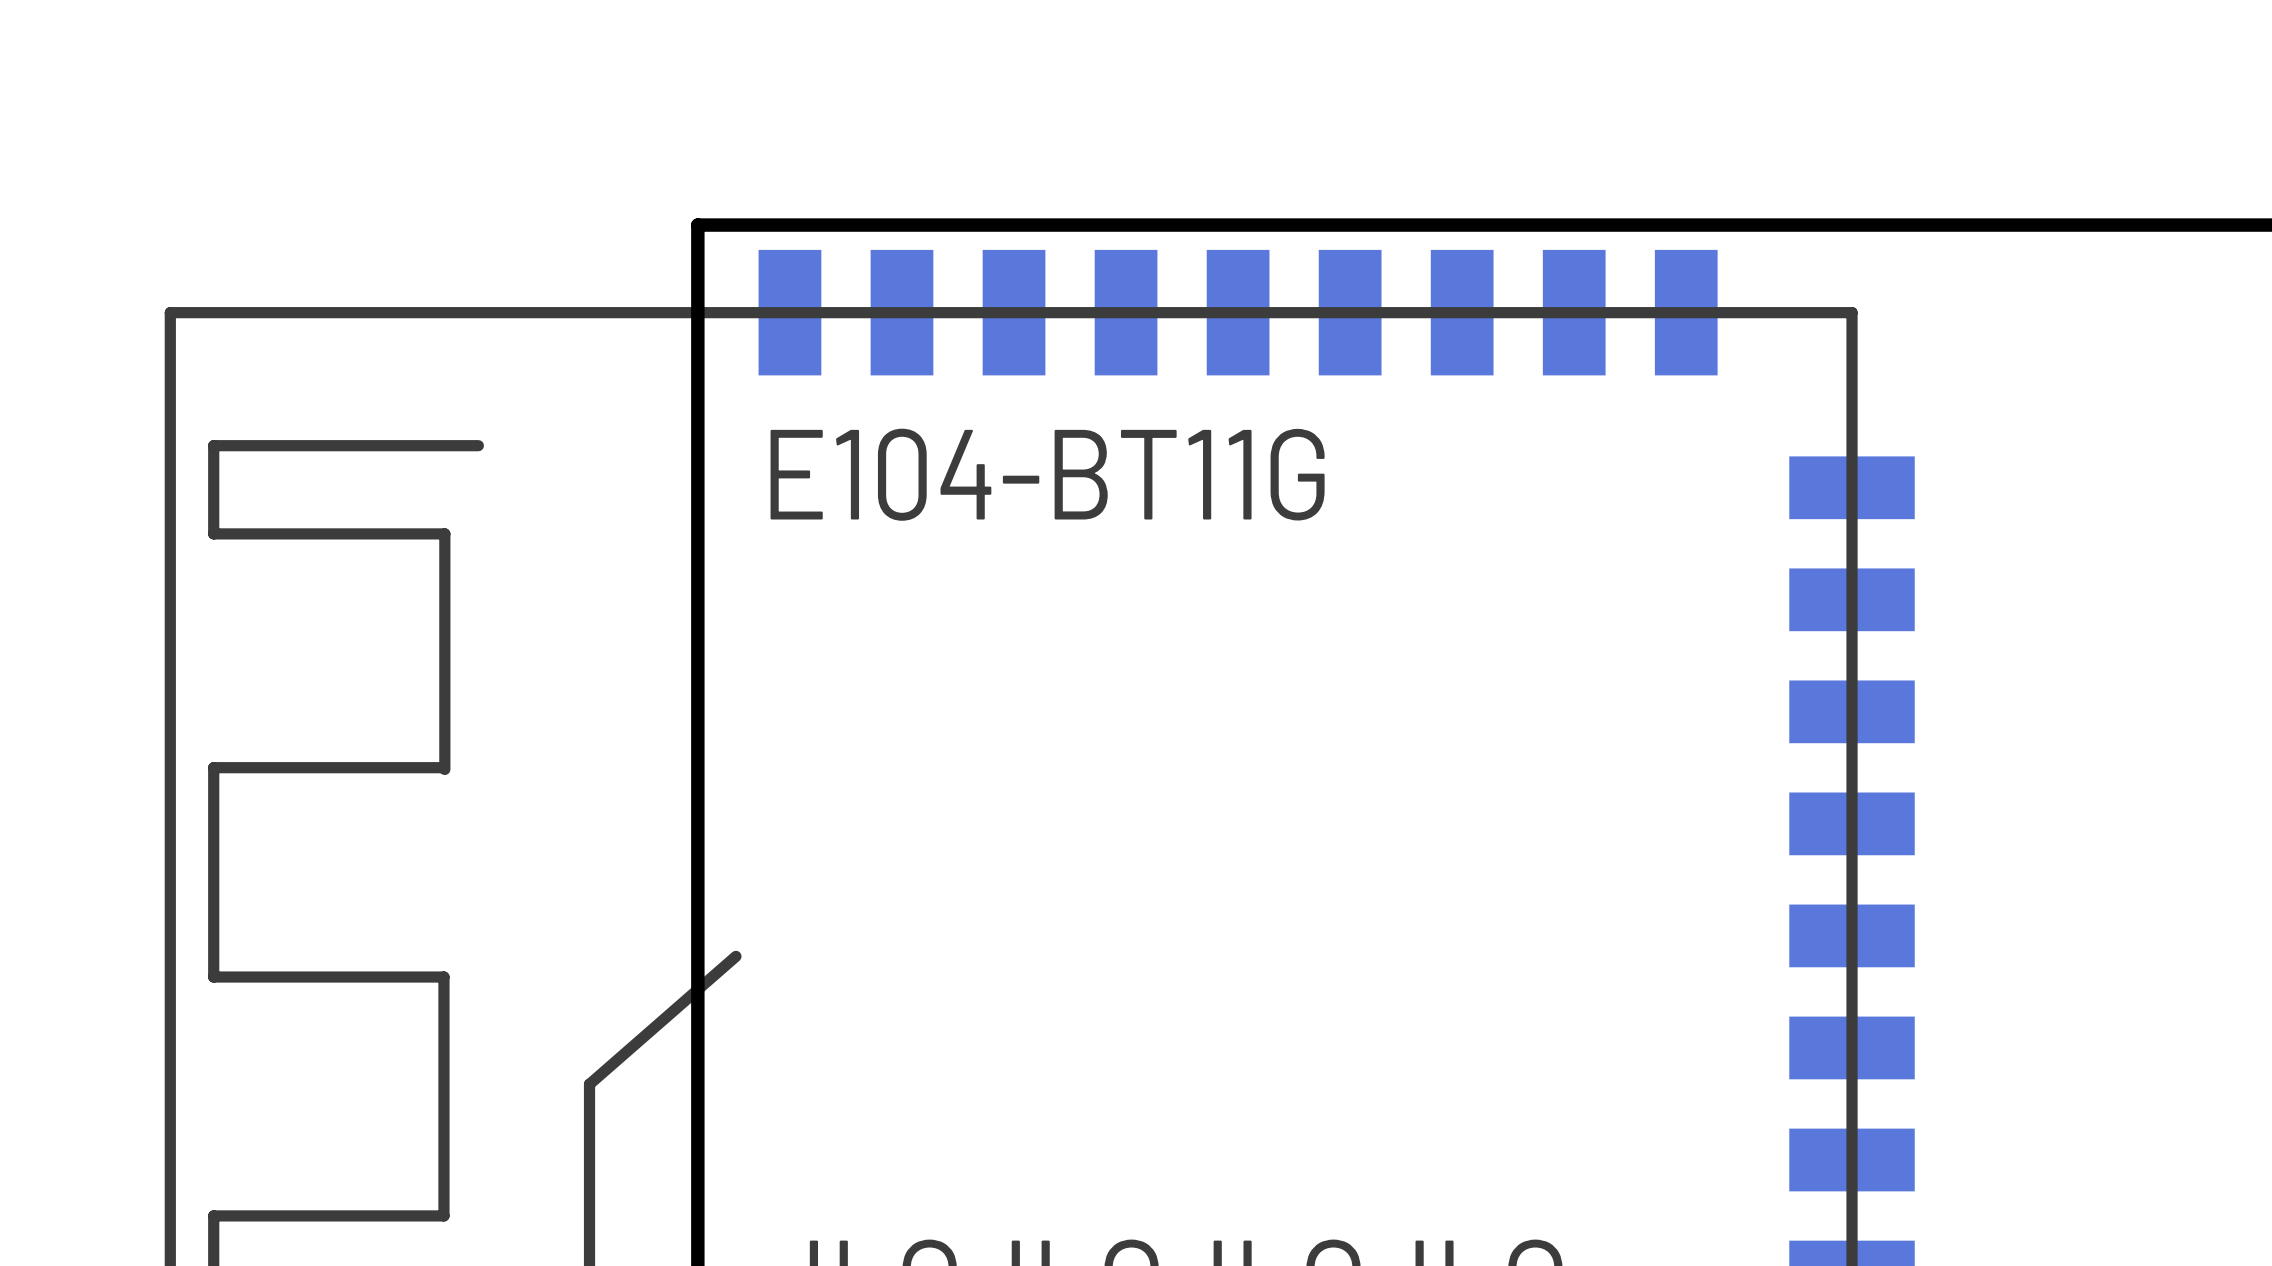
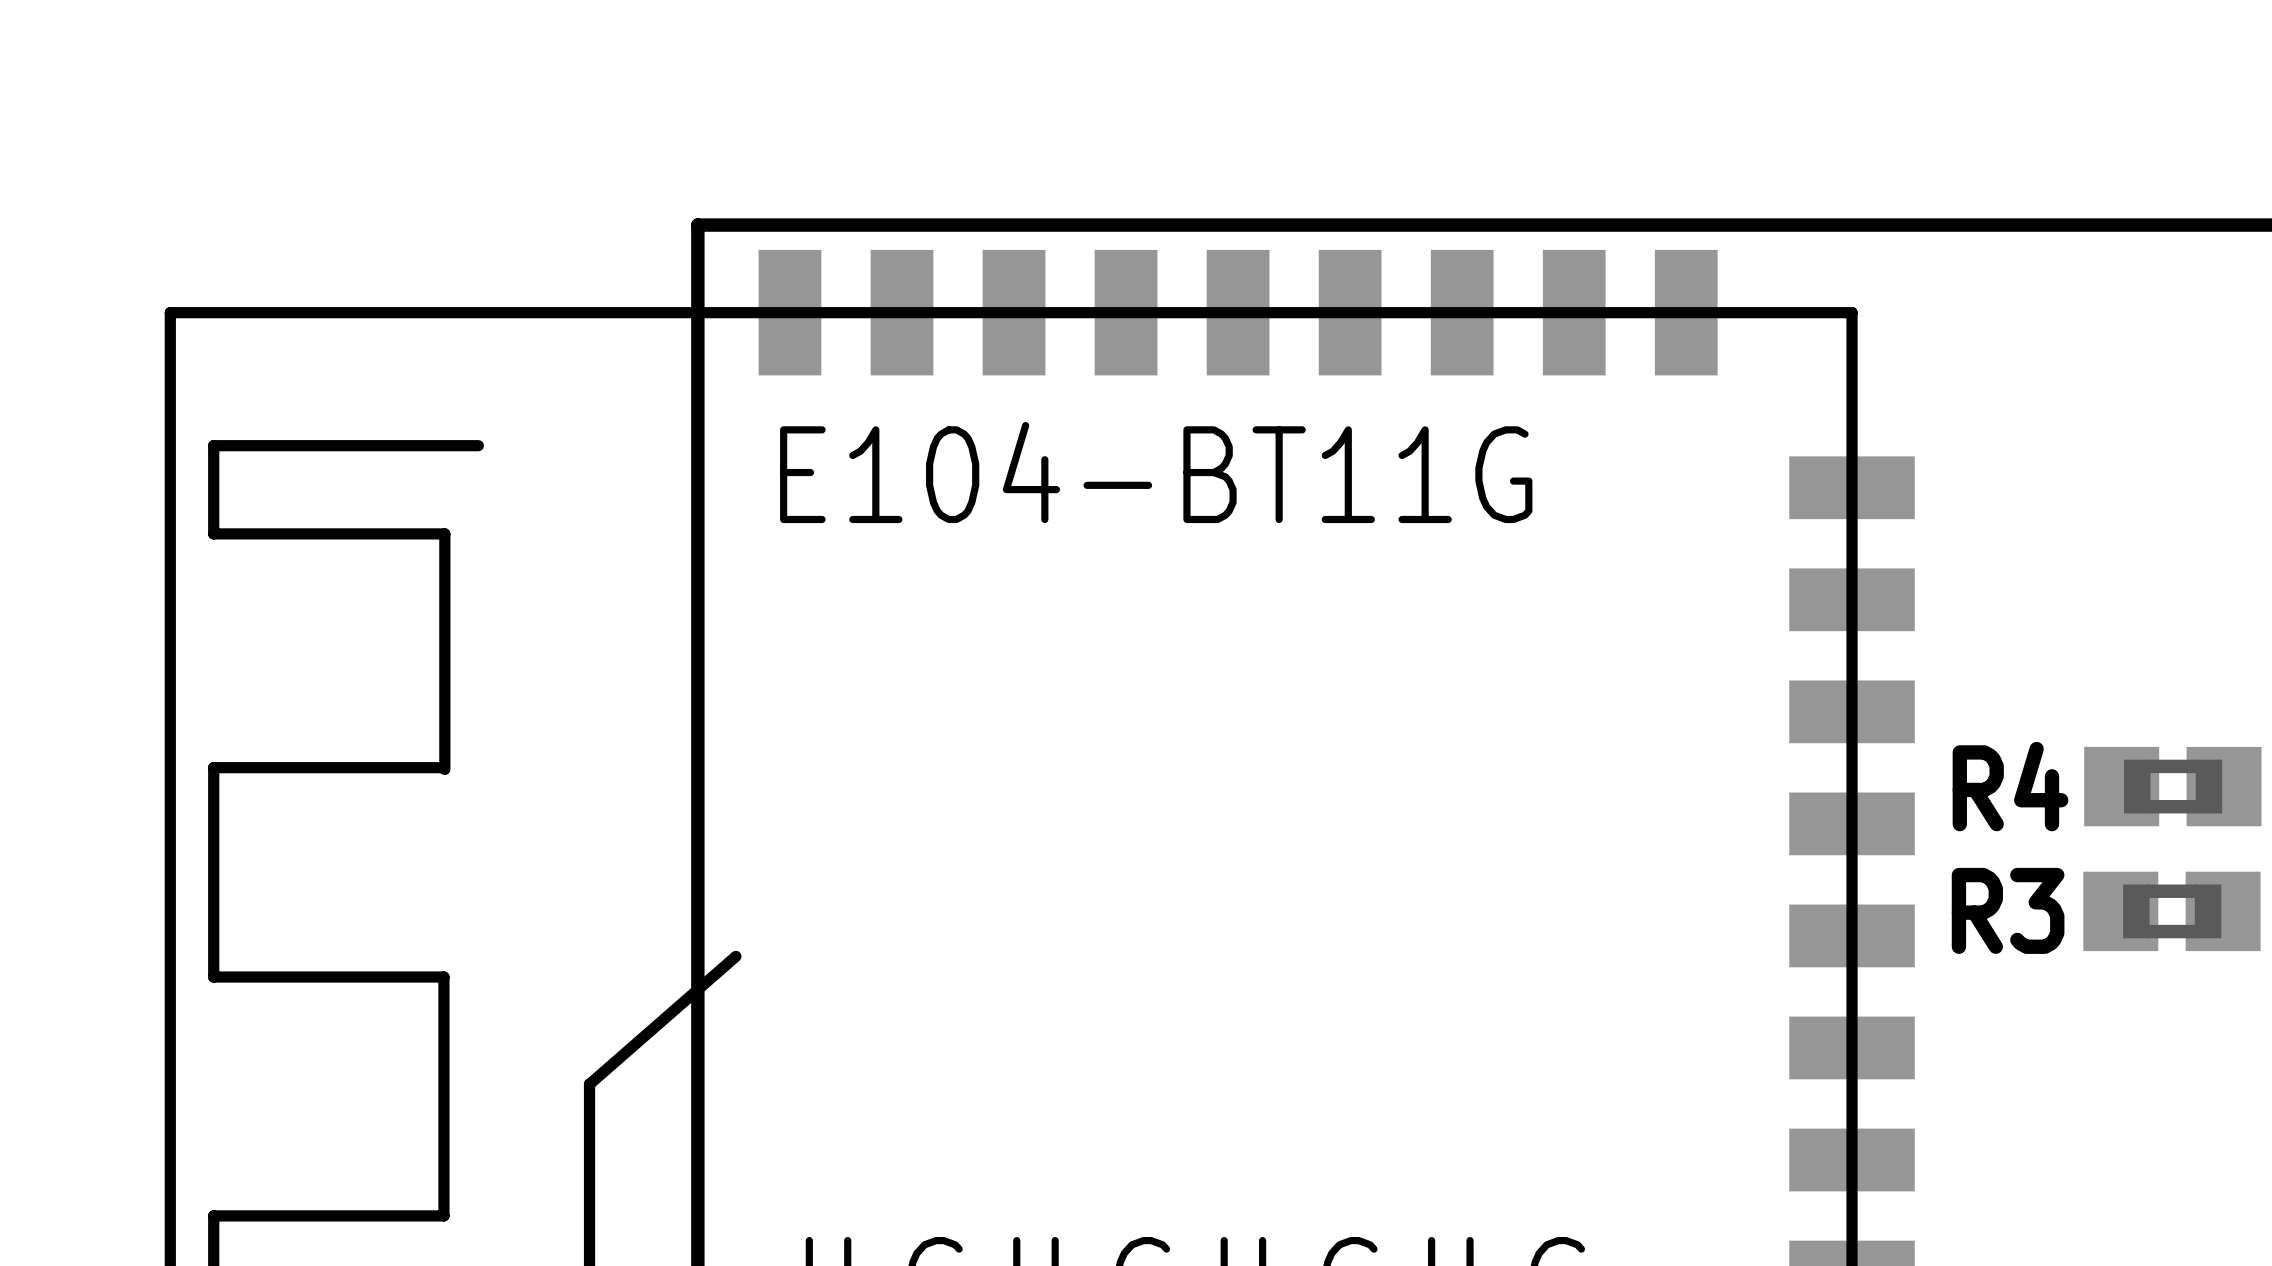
R4: none -> (2172, 786)
R3: none -> (2171, 911)

